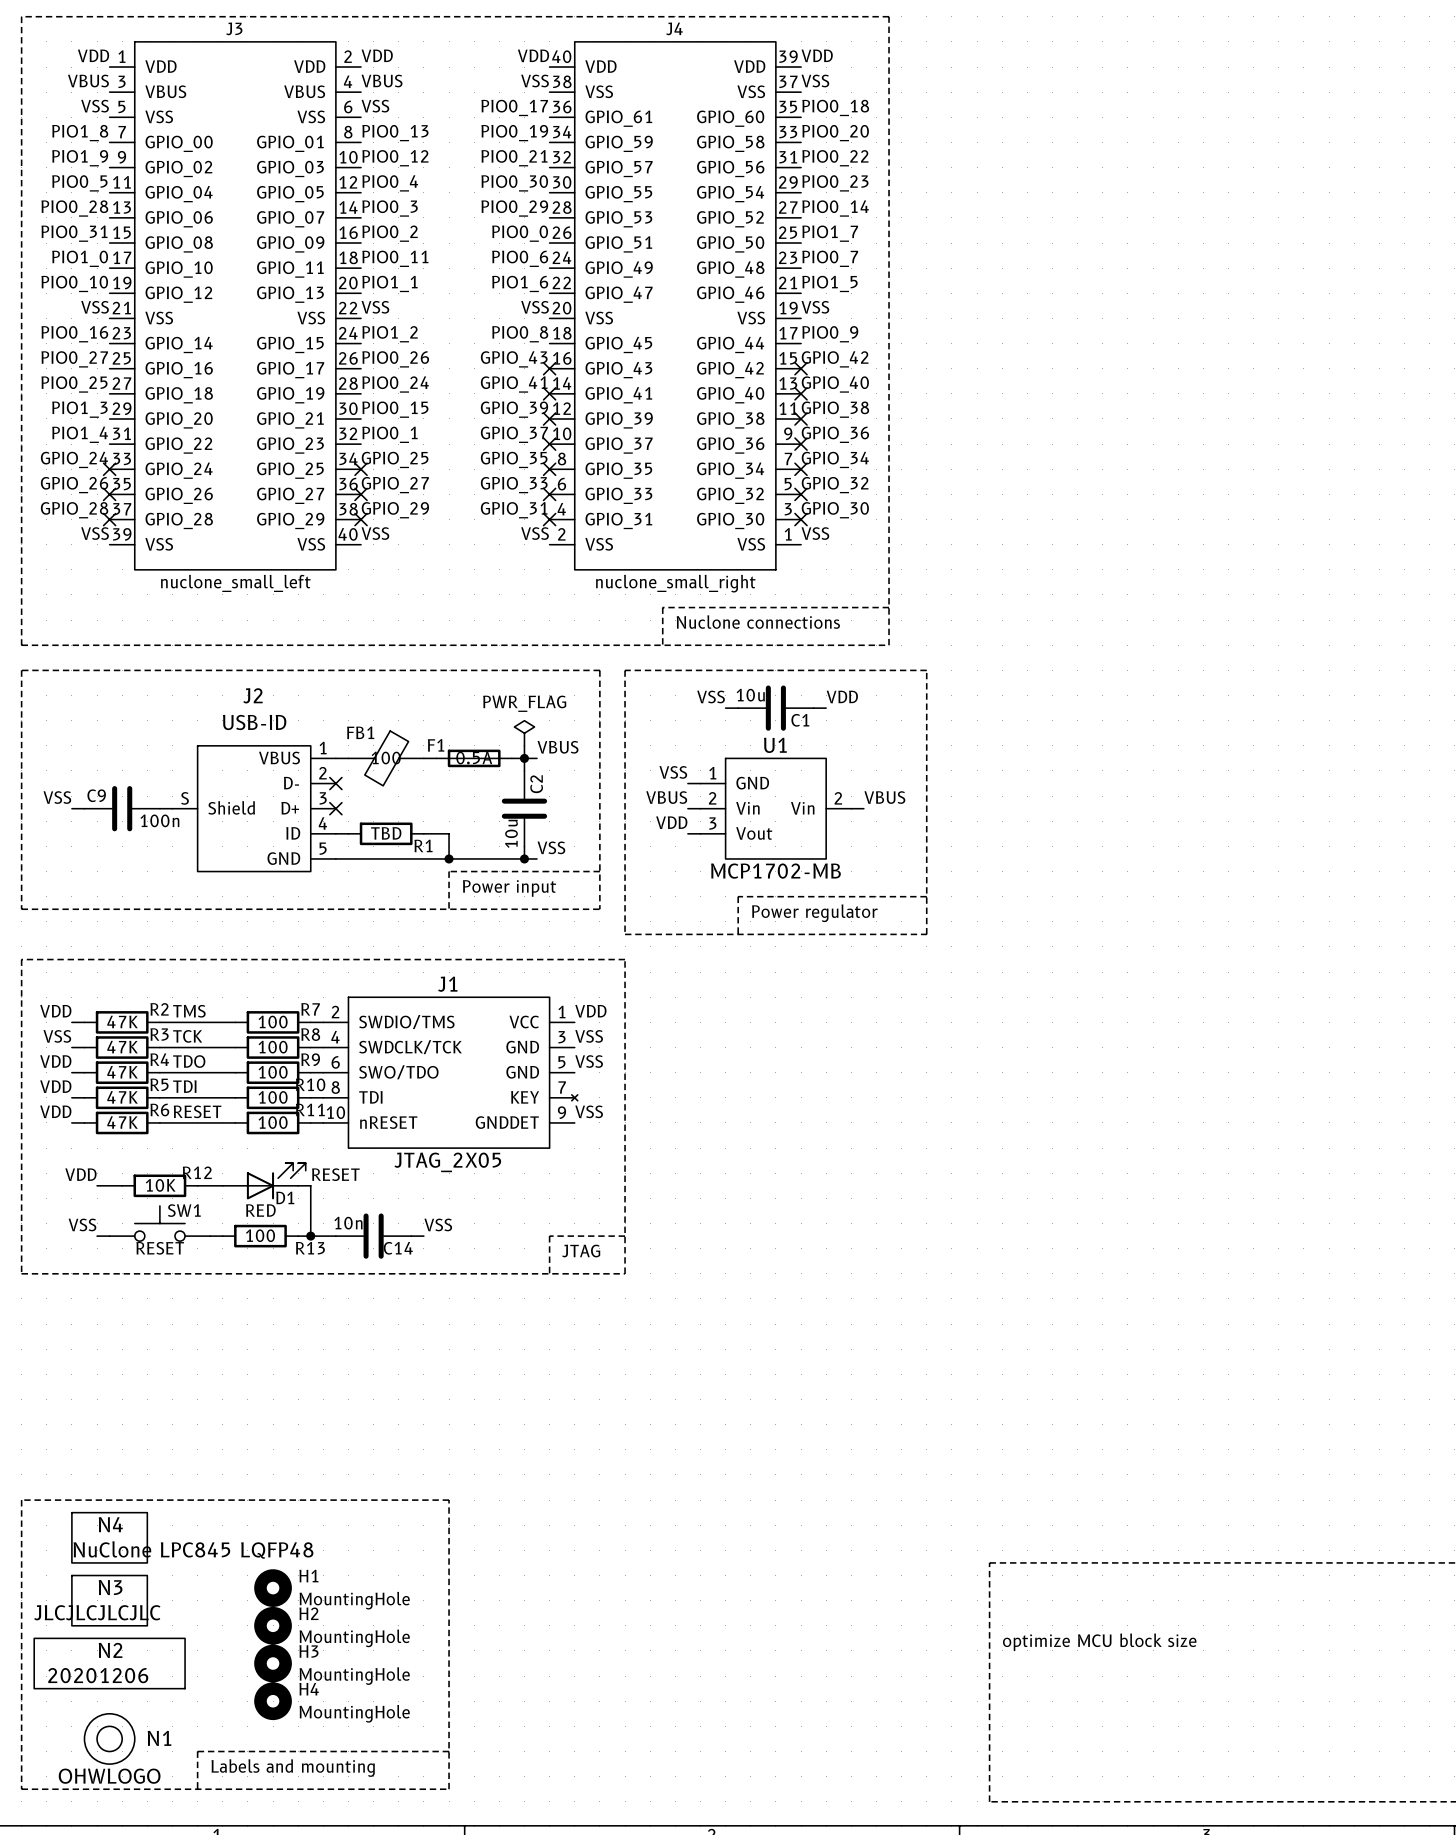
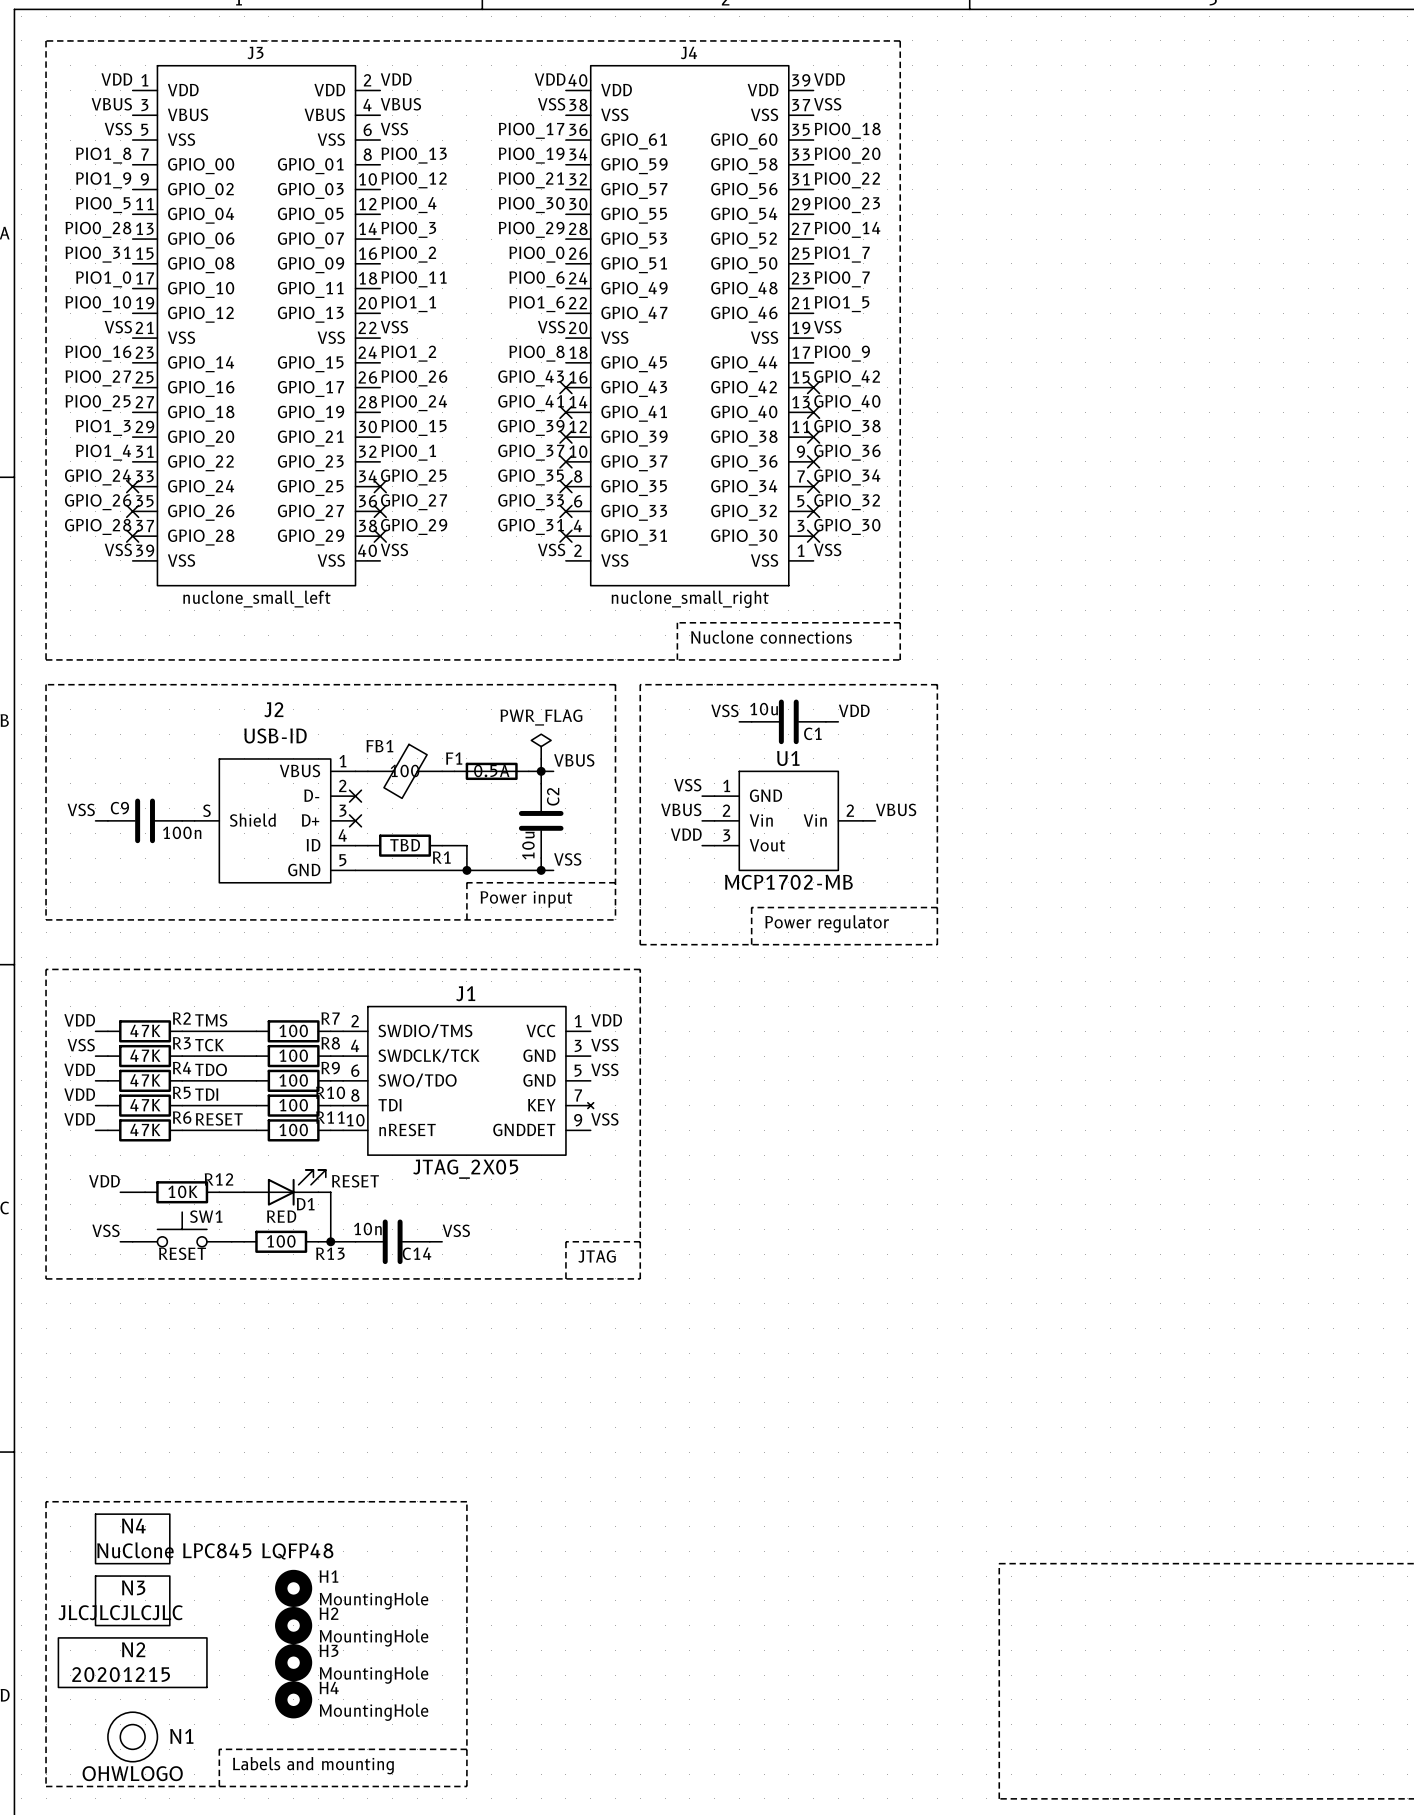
text: optimize MCU block size (1099, 1642) -> none
N2 value: 20201206 (98, 1675) -> 20201215 (121, 1674)

